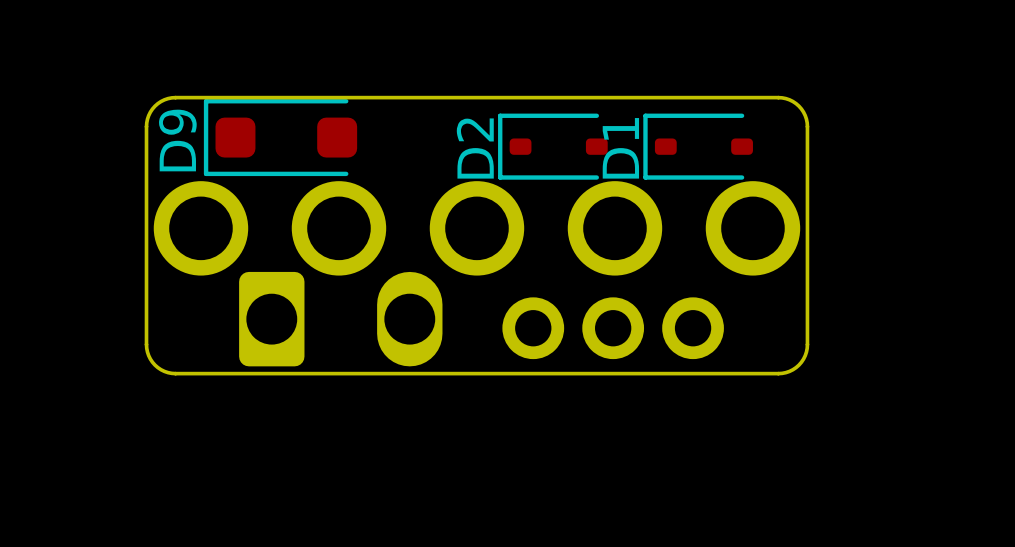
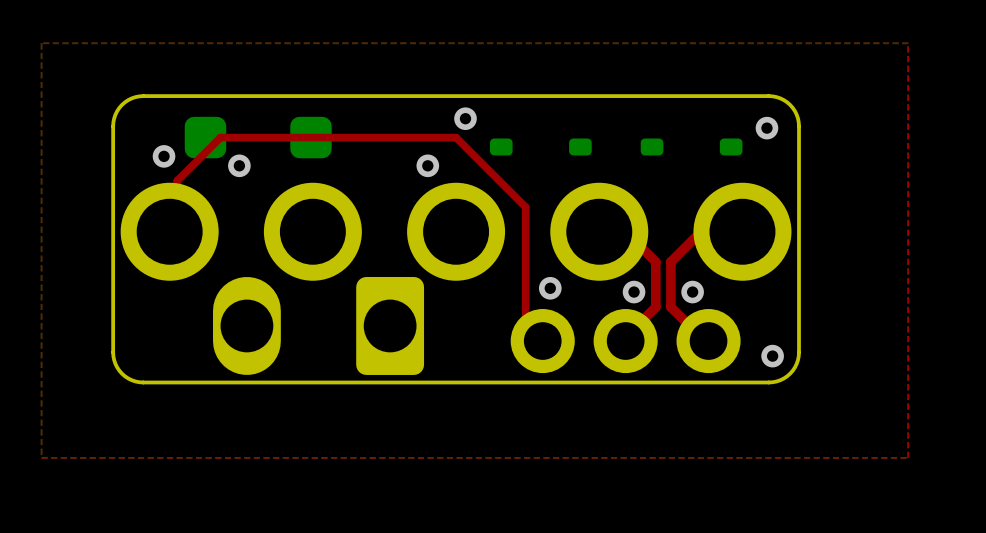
top zone outline: none -> (41, 43) (41, 457) (908, 457) (908, 43) (41, 43)
via: none -> (465, 118)
via: none -> (766, 128)
D9 side: top (280, 137) -> bottom (258, 137)
D2 side: top (552, 146) -> bottom (540, 146)
D1 side: top (698, 146) -> bottom (691, 146)
via: none -> (164, 156)
via: none -> (239, 165)
via: none -> (427, 165)
top track: none -> (177, 231) (177, 180) (220, 137) (456, 137) (525, 207) (525, 327) (538, 341)
top track: none -> (599, 231) (625, 231) (655, 261) (655, 307) (621, 341)
top track: none -> (734, 231) (701, 231) (670, 261) (670, 307) (704, 341)
via: none -> (550, 288)
via: none -> (634, 292)
via: none -> (692, 292)
part side: top (340, 319) -> bottom (318, 325)
part position: (613, 328) -> (625, 341)
via: none -> (772, 356)

